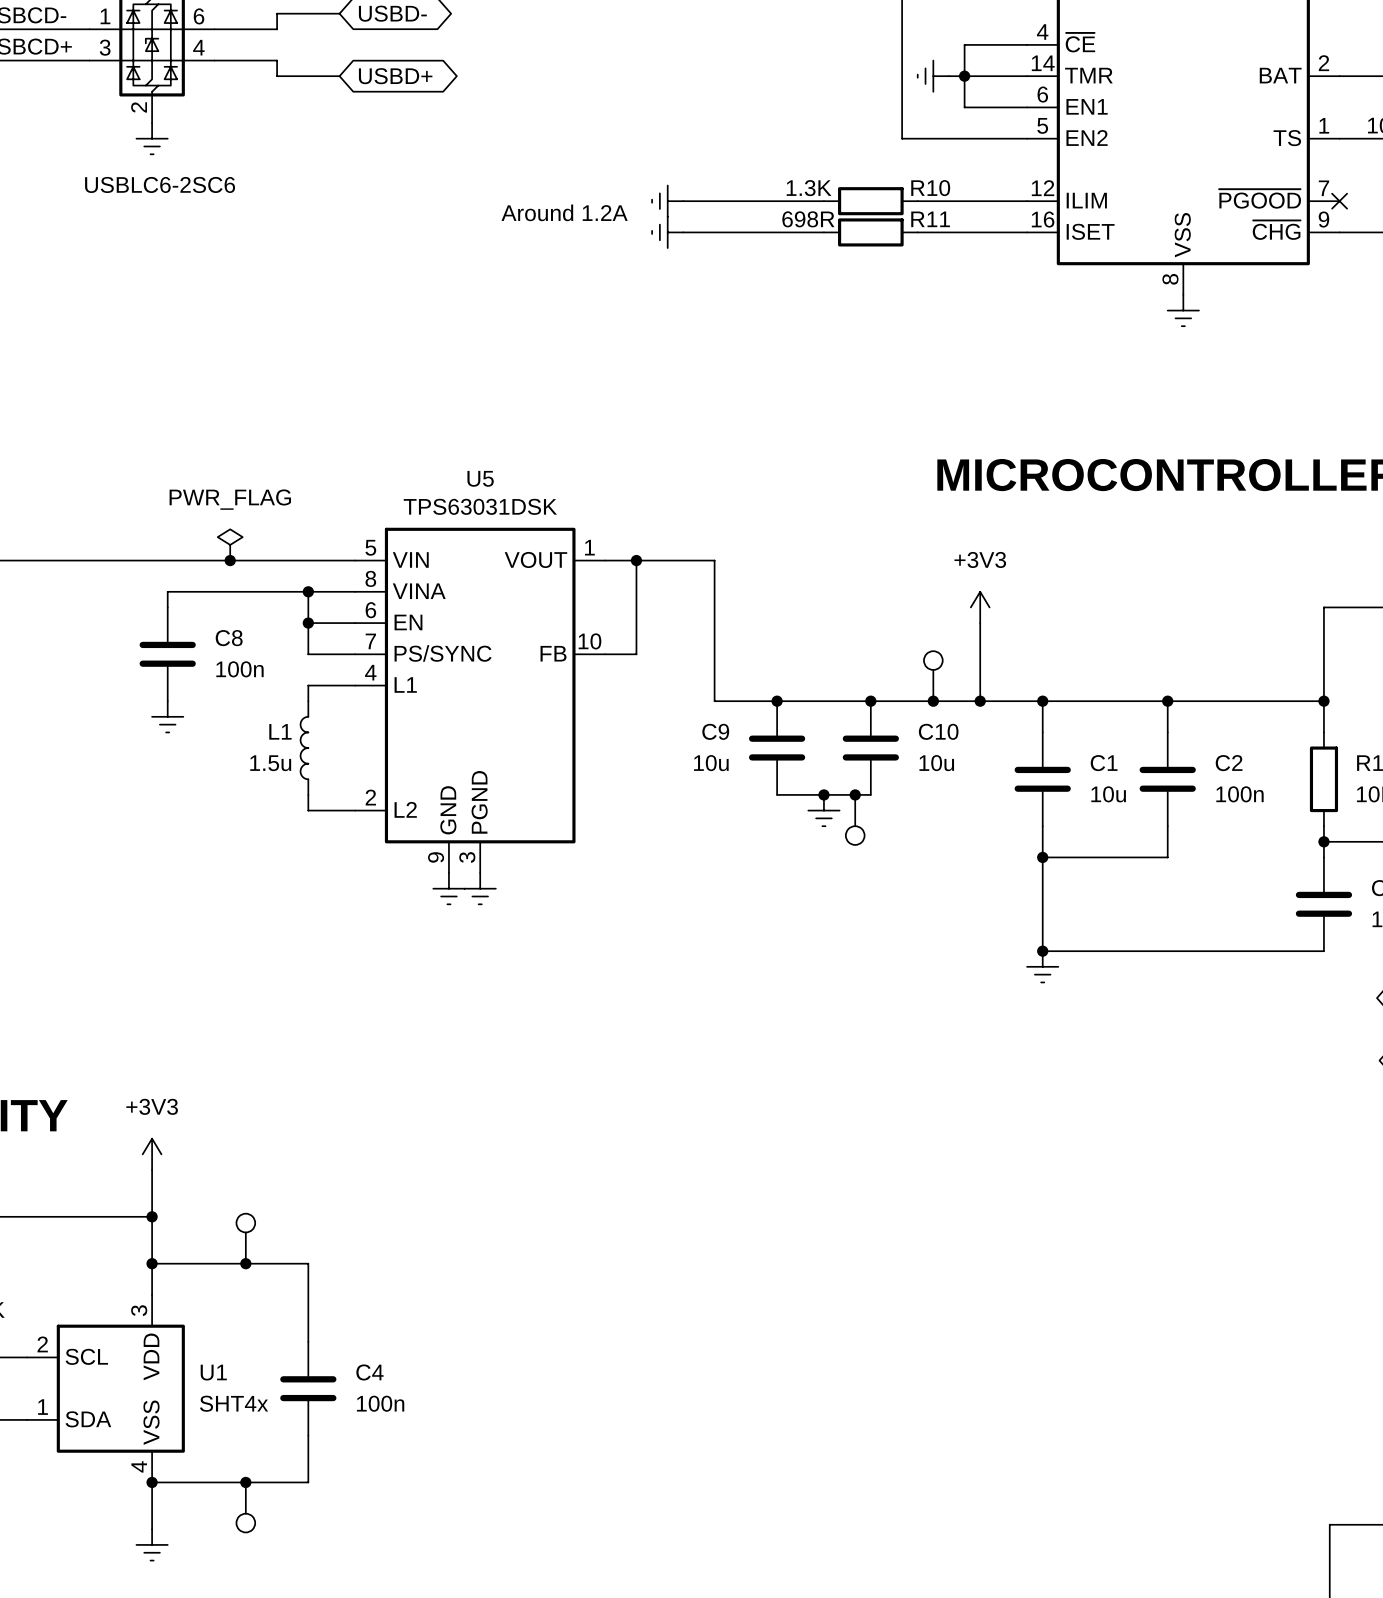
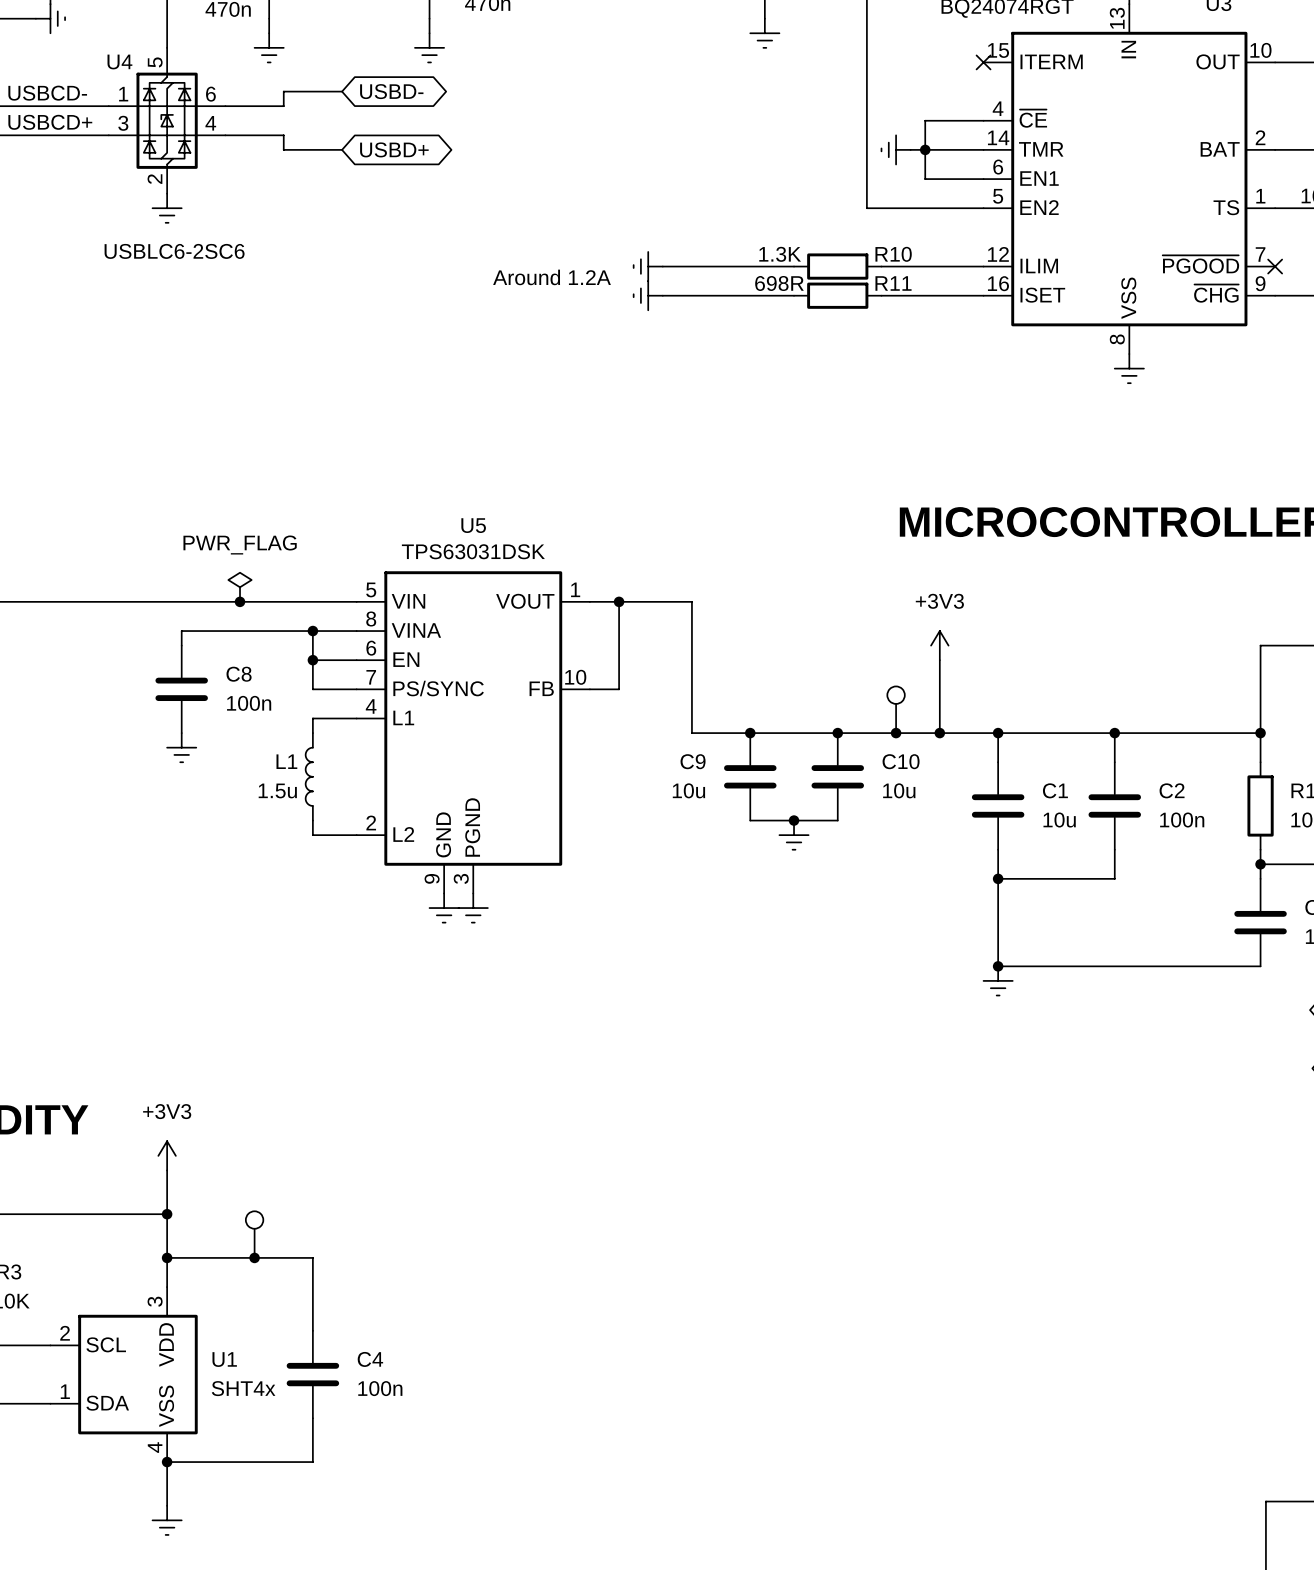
junction: (855, 794) -> none
part: (855, 819) -> none
junction: (245, 1482) -> none
part: (245, 1507) -> none

